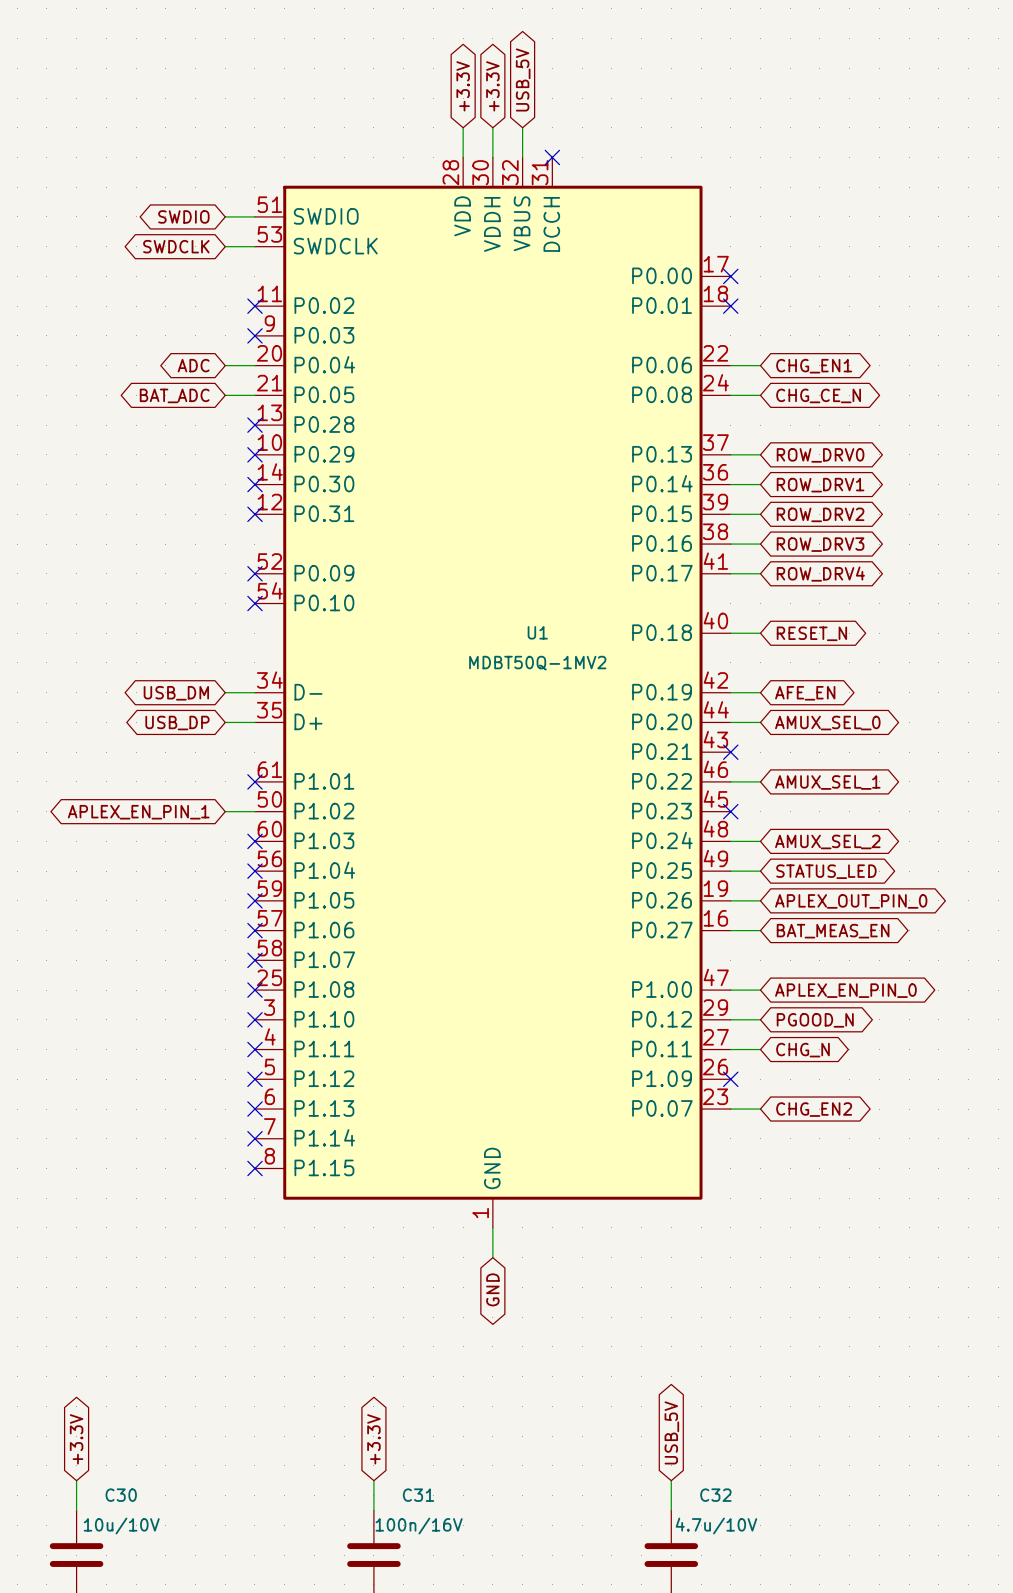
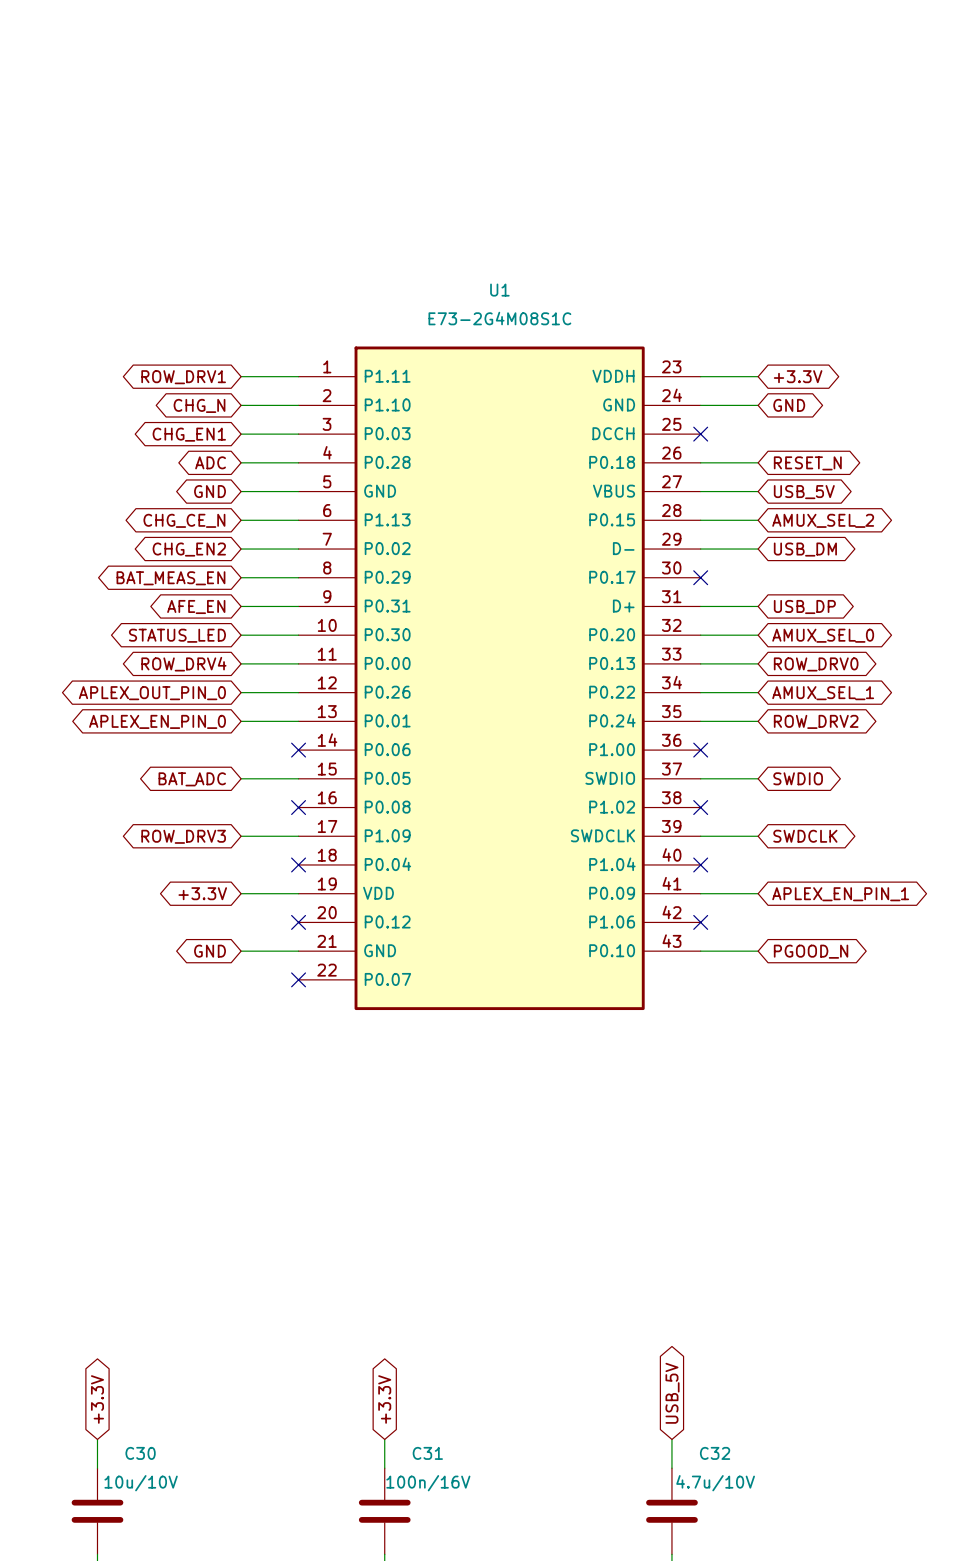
global label: USB_5V (523, 79) -> none
global label: +3.3V (463, 86) -> none
global label: +3.3V (492, 86) -> none
wire: (463, 127) (463, 157) -> none
wire: (492, 127) (492, 157) -> none
wire: (522, 127) (522, 157) -> none
U1 symbol: [254, 157, 731, 1228] -> [298, 346, 701, 1011]
no-connect mark: (552, 157) -> none
global label: SWDIO (183, 216) -> none
wire: (225, 216) (254, 216) -> none
global label: SWDCLK (176, 246) -> none
wire: (225, 246) (254, 246) -> none
no-connect mark: (730, 276) -> none
no-connect mark: (254, 306) -> none
no-connect mark: (730, 306) -> none
no-connect mark: (254, 335) -> none
global label position: ADC (193, 365) -> ADC (210, 462)
wire: (225, 365) (254, 365) -> none
wire: (730, 365) (760, 365) -> none
global label: CHG_EN1 (814, 366) -> none
wire: none -> (241, 376) (298, 376)
wire: none -> (700, 376) (758, 376)
global label: none -> +3.3V (798, 376)
global label: none -> ROW_DRV1 (183, 377)
global label: BAT_ADC (174, 395) -> none
wire: (225, 395) (254, 395) -> none
wire: (730, 395) (760, 395) -> none
global label: CHG_CE_N (818, 395) -> none
global label: none -> CHG_N (199, 405)
wire: none -> (241, 405) (298, 405)
wire: none -> (700, 405) (758, 405)
global label: none -> GND (789, 405)
no-connect mark: (254, 425) -> none
wire: none -> (241, 434) (298, 434)
no-connect mark: none -> (700, 434)
global label: none -> CHG_EN1 (189, 434)
no-connect mark: (254, 454) -> none
wire: (730, 454) (760, 454) -> none
global label position: ROW_DRV0 (820, 455) -> ROW_DRV0 (816, 664)
wire: none -> (241, 462) (298, 462)
wire: none -> (700, 462) (758, 462)
no-connect mark: (254, 484) -> none
wire: (730, 484) (760, 484) -> none
global label: ROW_DRV1 (820, 485) -> none
global label: none -> GND (210, 491)
wire: none -> (241, 491) (298, 491)
wire: none -> (700, 491) (758, 491)
global label: none -> USB_5V (804, 492)
no-connect mark: (254, 514) -> none
wire: (730, 514) (760, 514) -> none
global label position: ROW_DRV2 (820, 514) -> ROW_DRV2 (816, 721)
global label: none -> CHG_CE_N (184, 520)
wire: none -> (241, 520) (298, 520)
wire: none -> (700, 520) (758, 520)
global label: none -> AMUX_SEL_2 (823, 520)
wire: (730, 544) (760, 544) -> none
global label: ROW_DRV3 (820, 544) -> none
wire: none -> (241, 549) (298, 549)
wire: none -> (700, 549) (758, 549)
global label: none -> CHG_EN2 (189, 549)
global label: none -> USB_DM (805, 549)
no-connect mark: (254, 573) -> none
wire: (730, 573) (760, 573) -> none
global label: ROW_DRV4 (820, 574) -> none
wire: none -> (241, 577) (298, 577)
no-connect mark: none -> (700, 577)
global label: none -> BAT_MEAS_EN (170, 578)
no-connect mark: (254, 603) -> none
global label: none -> AFE_EN (196, 607)
wire: none -> (241, 606) (298, 606)
wire: none -> (700, 606) (758, 606)
global label: none -> USB_DP (804, 607)
U1 name position: U1 (537, 632) -> U1 (499, 290)
wire: (730, 633) (760, 633) -> none
global label position: RESET_N (811, 633) -> RESET_N (807, 463)
global label: none -> STATUS_LED (177, 635)
wire: none -> (241, 635) (298, 635)
wire: none -> (700, 635) (758, 635)
U1 value: MDBT50Q-1MV2 (537, 663) -> E73-2G4M08S1C (499, 318)
wire: none -> (241, 663) (298, 663)
wire: none -> (700, 663) (758, 663)
global label: none -> ROW_DRV4 (183, 664)
wire: (225, 692) (254, 692) -> none
wire: (730, 692) (760, 692) -> none
global label: USB_DM (176, 693) -> none
global label: AFE_EN (805, 693) -> none
wire: none -> (241, 692) (298, 692)
wire: none -> (700, 692) (758, 692)
global label: none -> APLEX_OUT_PIN_0 (152, 693)
wire: (225, 722) (254, 722) -> none
wire: (730, 722) (760, 722) -> none
global label: USB_DP (177, 723) -> none
global label position: AMUX_SEL_0 (827, 723) -> AMUX_SEL_0 (823, 635)
global label: none -> APLEX_EN_PIN_0 (157, 721)
wire: none -> (241, 721) (298, 721)
wire: none -> (700, 721) (758, 721)
no-connect mark: (730, 752) -> none
no-connect mark: none -> (298, 750)
no-connect mark: none -> (700, 750)
no-connect mark: (254, 781) -> none
wire: (730, 781) (760, 781) -> none
global label position: AMUX_SEL_1 (827, 782) -> AMUX_SEL_1 (823, 693)
wire: none -> (241, 778) (298, 778)
wire: none -> (700, 778) (758, 778)
global label: none -> SWDIO (798, 778)
global label: none -> BAT_ADC (192, 779)
wire: (225, 811) (254, 811) -> none
no-connect mark: (730, 811) -> none
global label: APLEX_EN_PIN_1 (138, 812) -> none
no-connect mark: none -> (298, 807)
no-connect mark: none -> (700, 807)
no-connect mark: (254, 841) -> none
wire: (730, 841) (760, 841) -> none
global label: AMUX_SEL_2 (827, 841) -> none
global label: none -> ROW_DRV3 (183, 836)
wire: none -> (241, 836) (298, 836)
wire: none -> (700, 836) (758, 836)
global label: none -> SWDCLK (805, 836)
no-connect mark: (254, 871) -> none
wire: (730, 871) (760, 871) -> none
global label: STATUS_LED (826, 871) -> none
no-connect mark: none -> (298, 864)
no-connect mark: none -> (700, 864)
no-connect mark: (254, 900) -> none
wire: (730, 900) (760, 900) -> none
global label: APLEX_OUT_PIN_0 (851, 901) -> APLEX_EN_PIN_1 (840, 894)
global label: none -> +3.3V (202, 893)
wire: none -> (241, 893) (298, 893)
wire: none -> (700, 893) (758, 893)
no-connect mark: (254, 930) -> none
wire: (730, 930) (760, 930) -> none
global label: BAT_MEAS_EN (833, 931) -> none
no-connect mark: none -> (298, 922)
no-connect mark: none -> (700, 922)
no-connect mark: (254, 960) -> none
global label: none -> GND (210, 951)
wire: none -> (241, 951) (298, 951)
wire: none -> (700, 951) (758, 951)
no-connect mark: (254, 990) -> none
wire: (730, 990) (760, 990) -> none
global label: APLEX_EN_PIN_0 (845, 990) -> none
no-connect mark: none -> (298, 979)
no-connect mark: (254, 1019) -> none
wire: (730, 1019) (760, 1019) -> none
global label position: PGOOD_N (815, 1020) -> PGOOD_N (811, 951)
no-connect mark: (254, 1049) -> none
wire: (730, 1049) (760, 1049) -> none
global label: CHG_N (802, 1050) -> none
no-connect mark: (254, 1079) -> none
no-connect mark: (730, 1079) -> none
no-connect mark: (254, 1109) -> none
wire: (730, 1109) (760, 1109) -> none
global label: CHG_EN2 (814, 1109) -> none
no-connect mark: (254, 1138) -> none
no-connect mark: (254, 1168) -> none
wire: (492, 1227) (492, 1257) -> none
global label: GND (492, 1289) -> none

